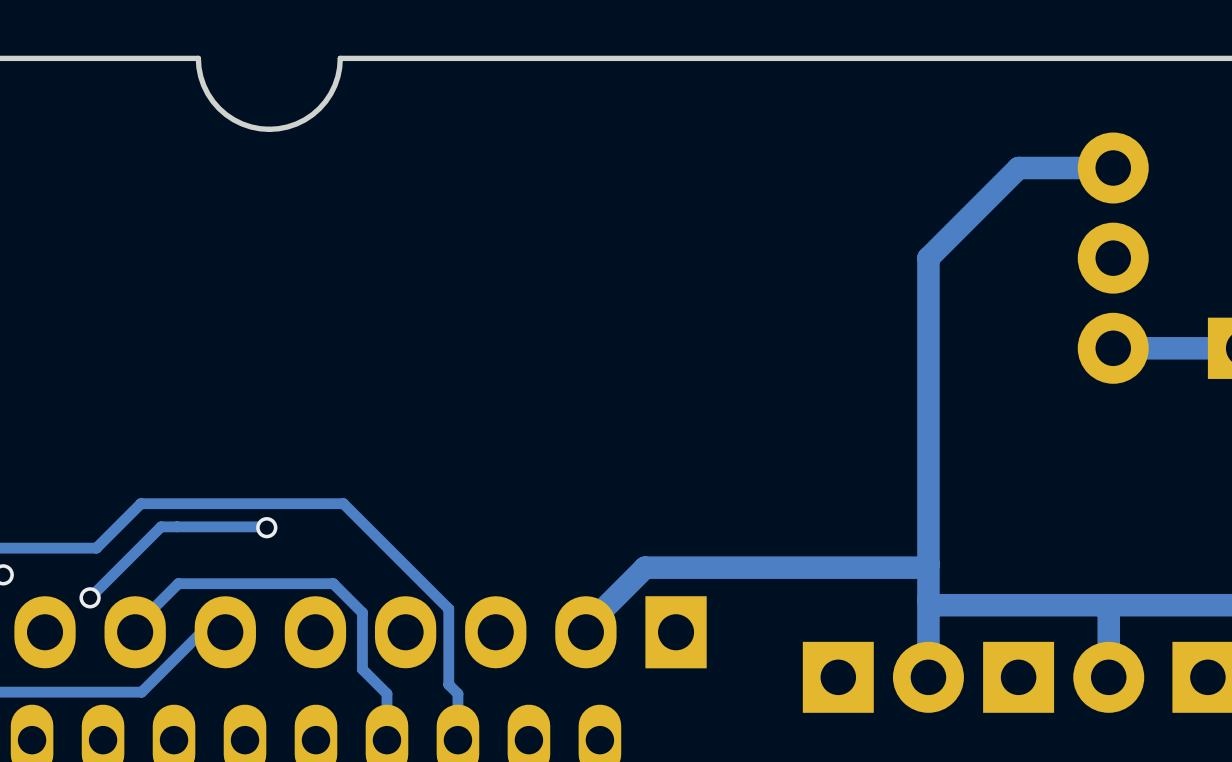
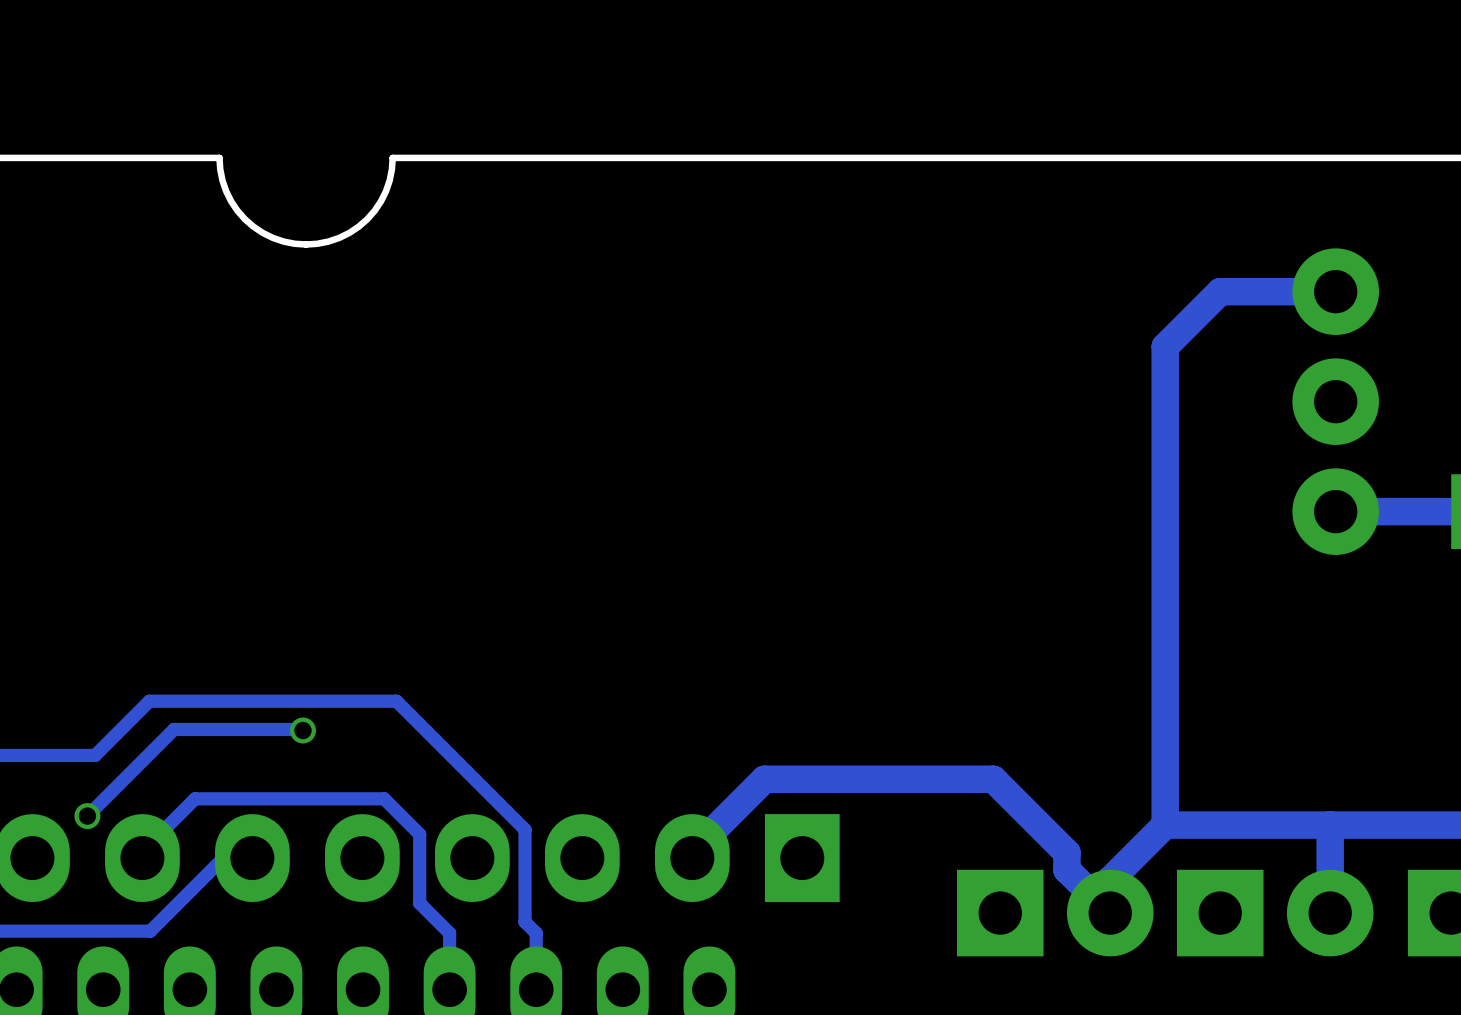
track: (973, 213) (928, 258) (928, 650) -> (1165, 346) (1165, 825) (1110, 880)
track: (928, 564) (925, 567) (832, 567) -> (1110, 913) (1066, 869) (1066, 852) (993, 779)
track: (928, 600) (932, 605) (973, 605) -> none

